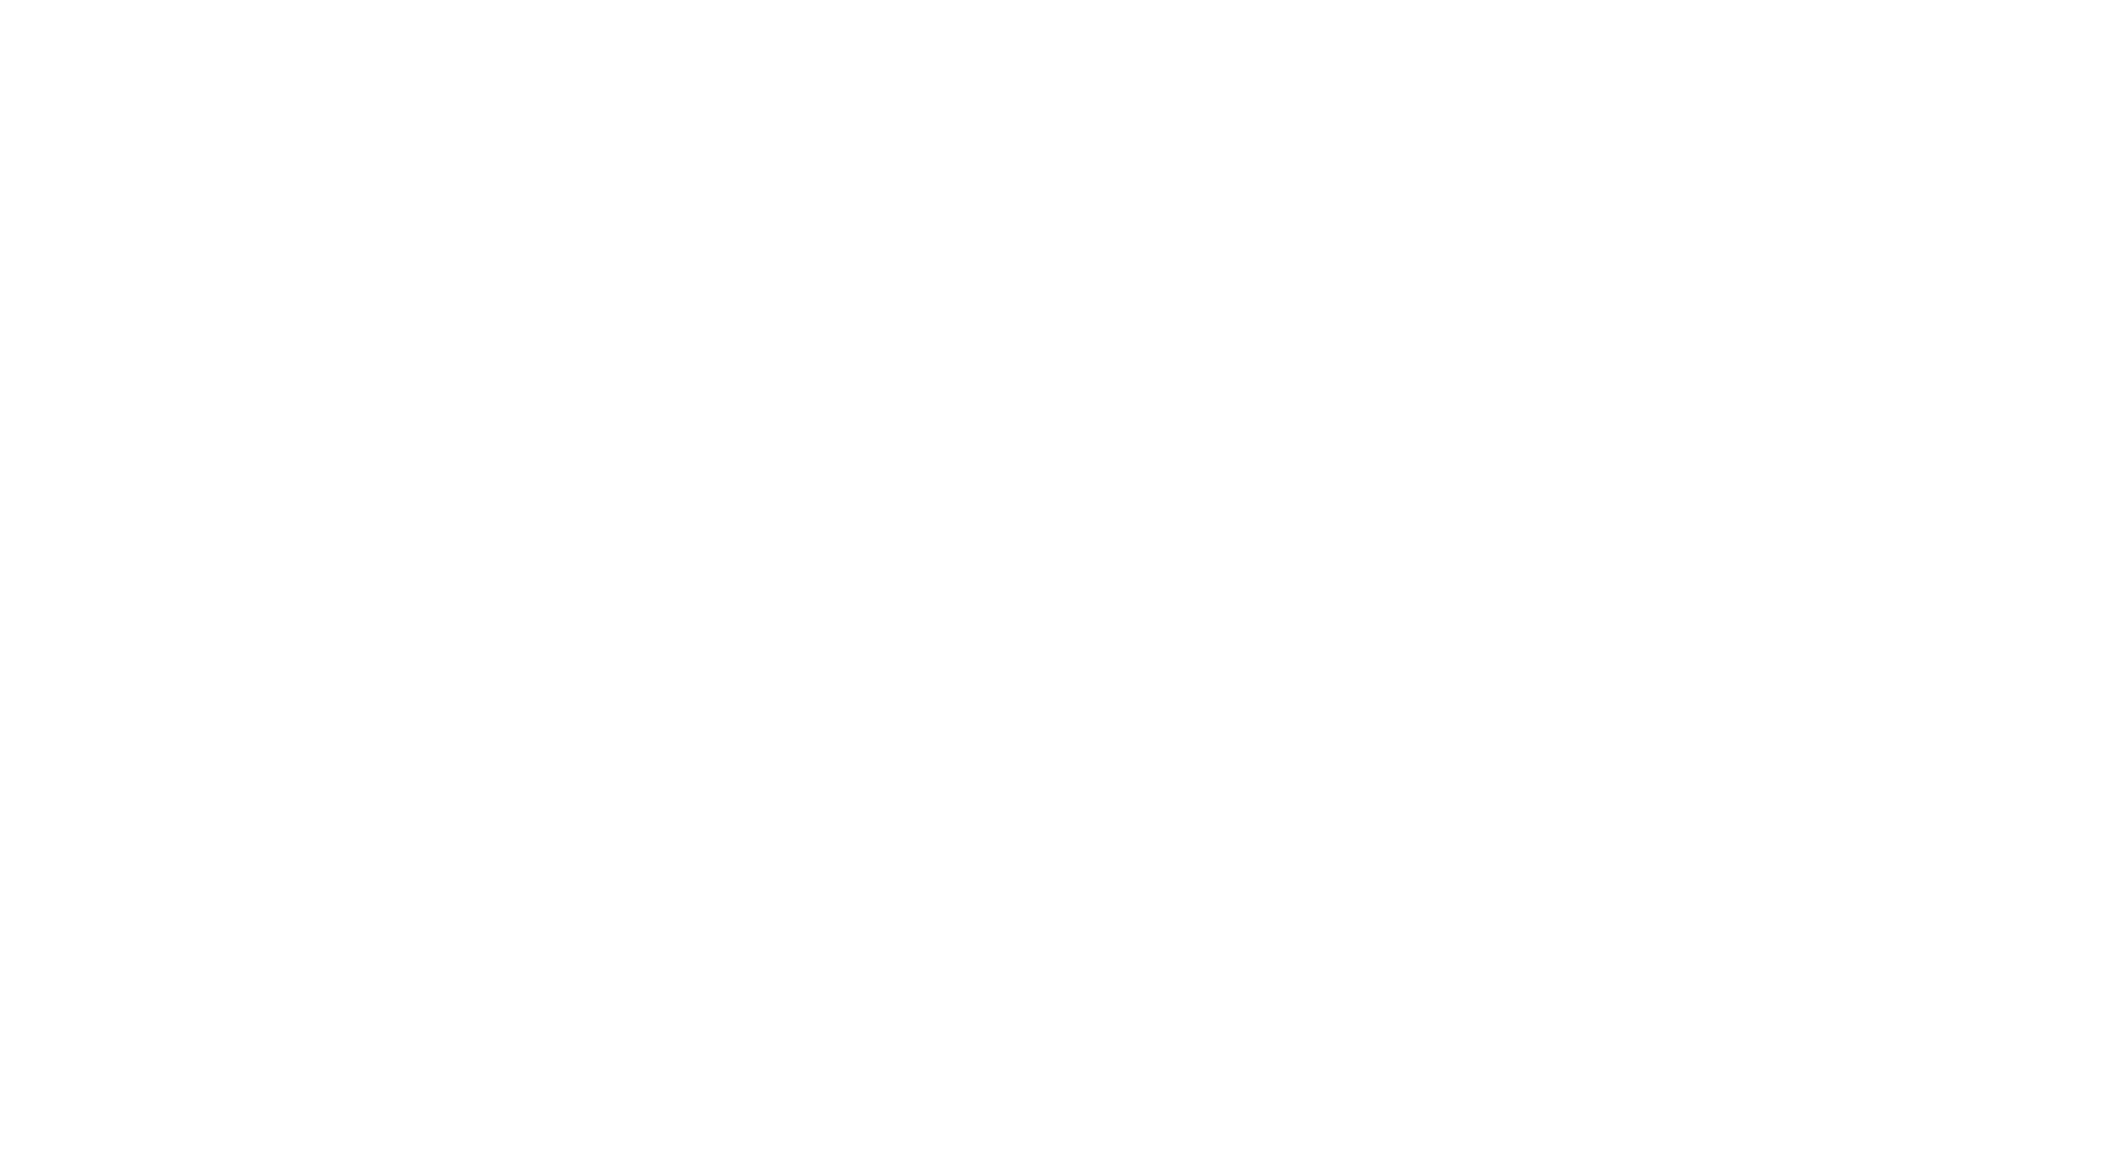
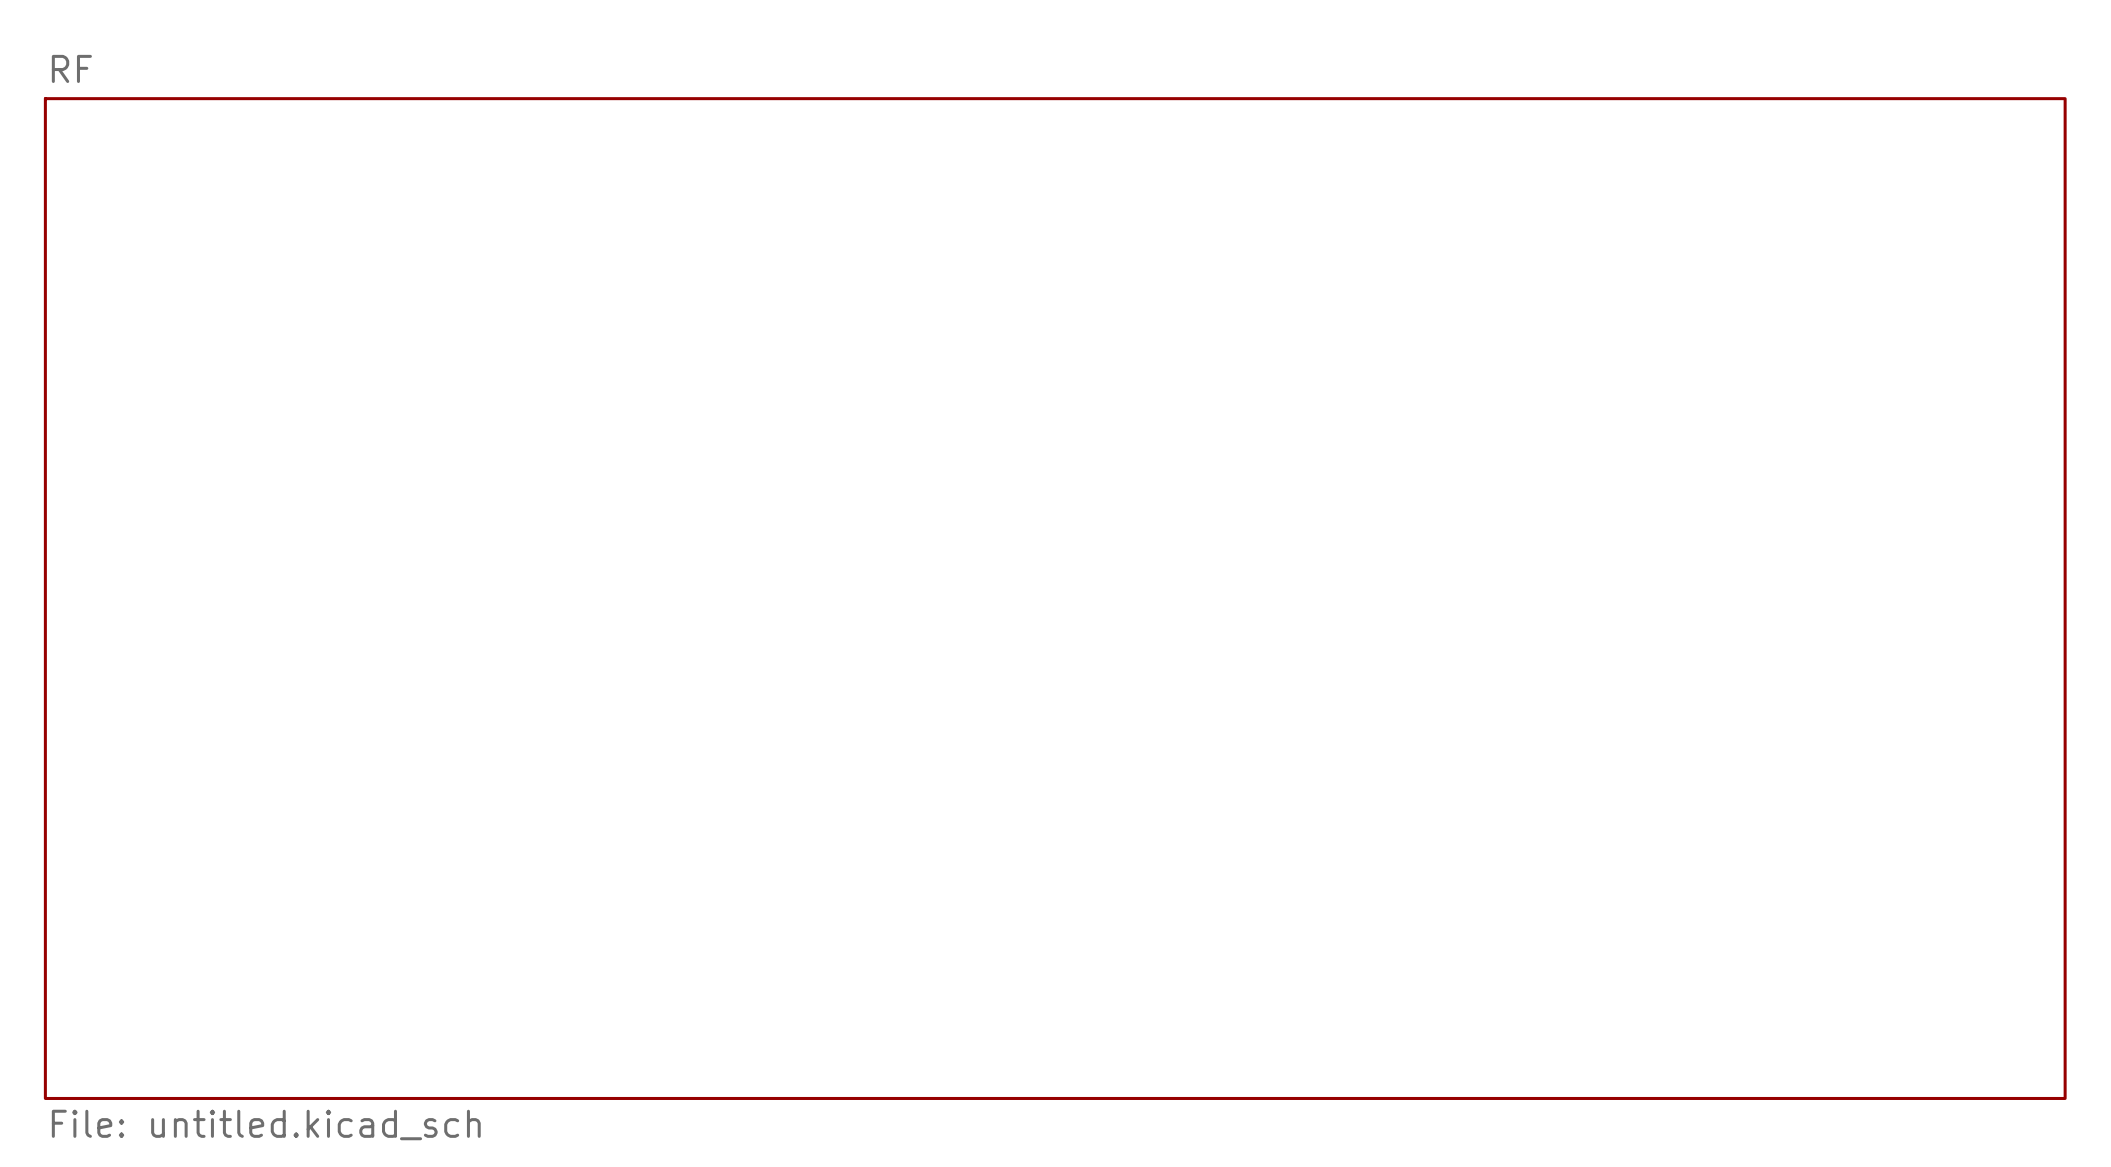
sheet RF: none -> File: untitled.kicad_sch (1055, 598)

